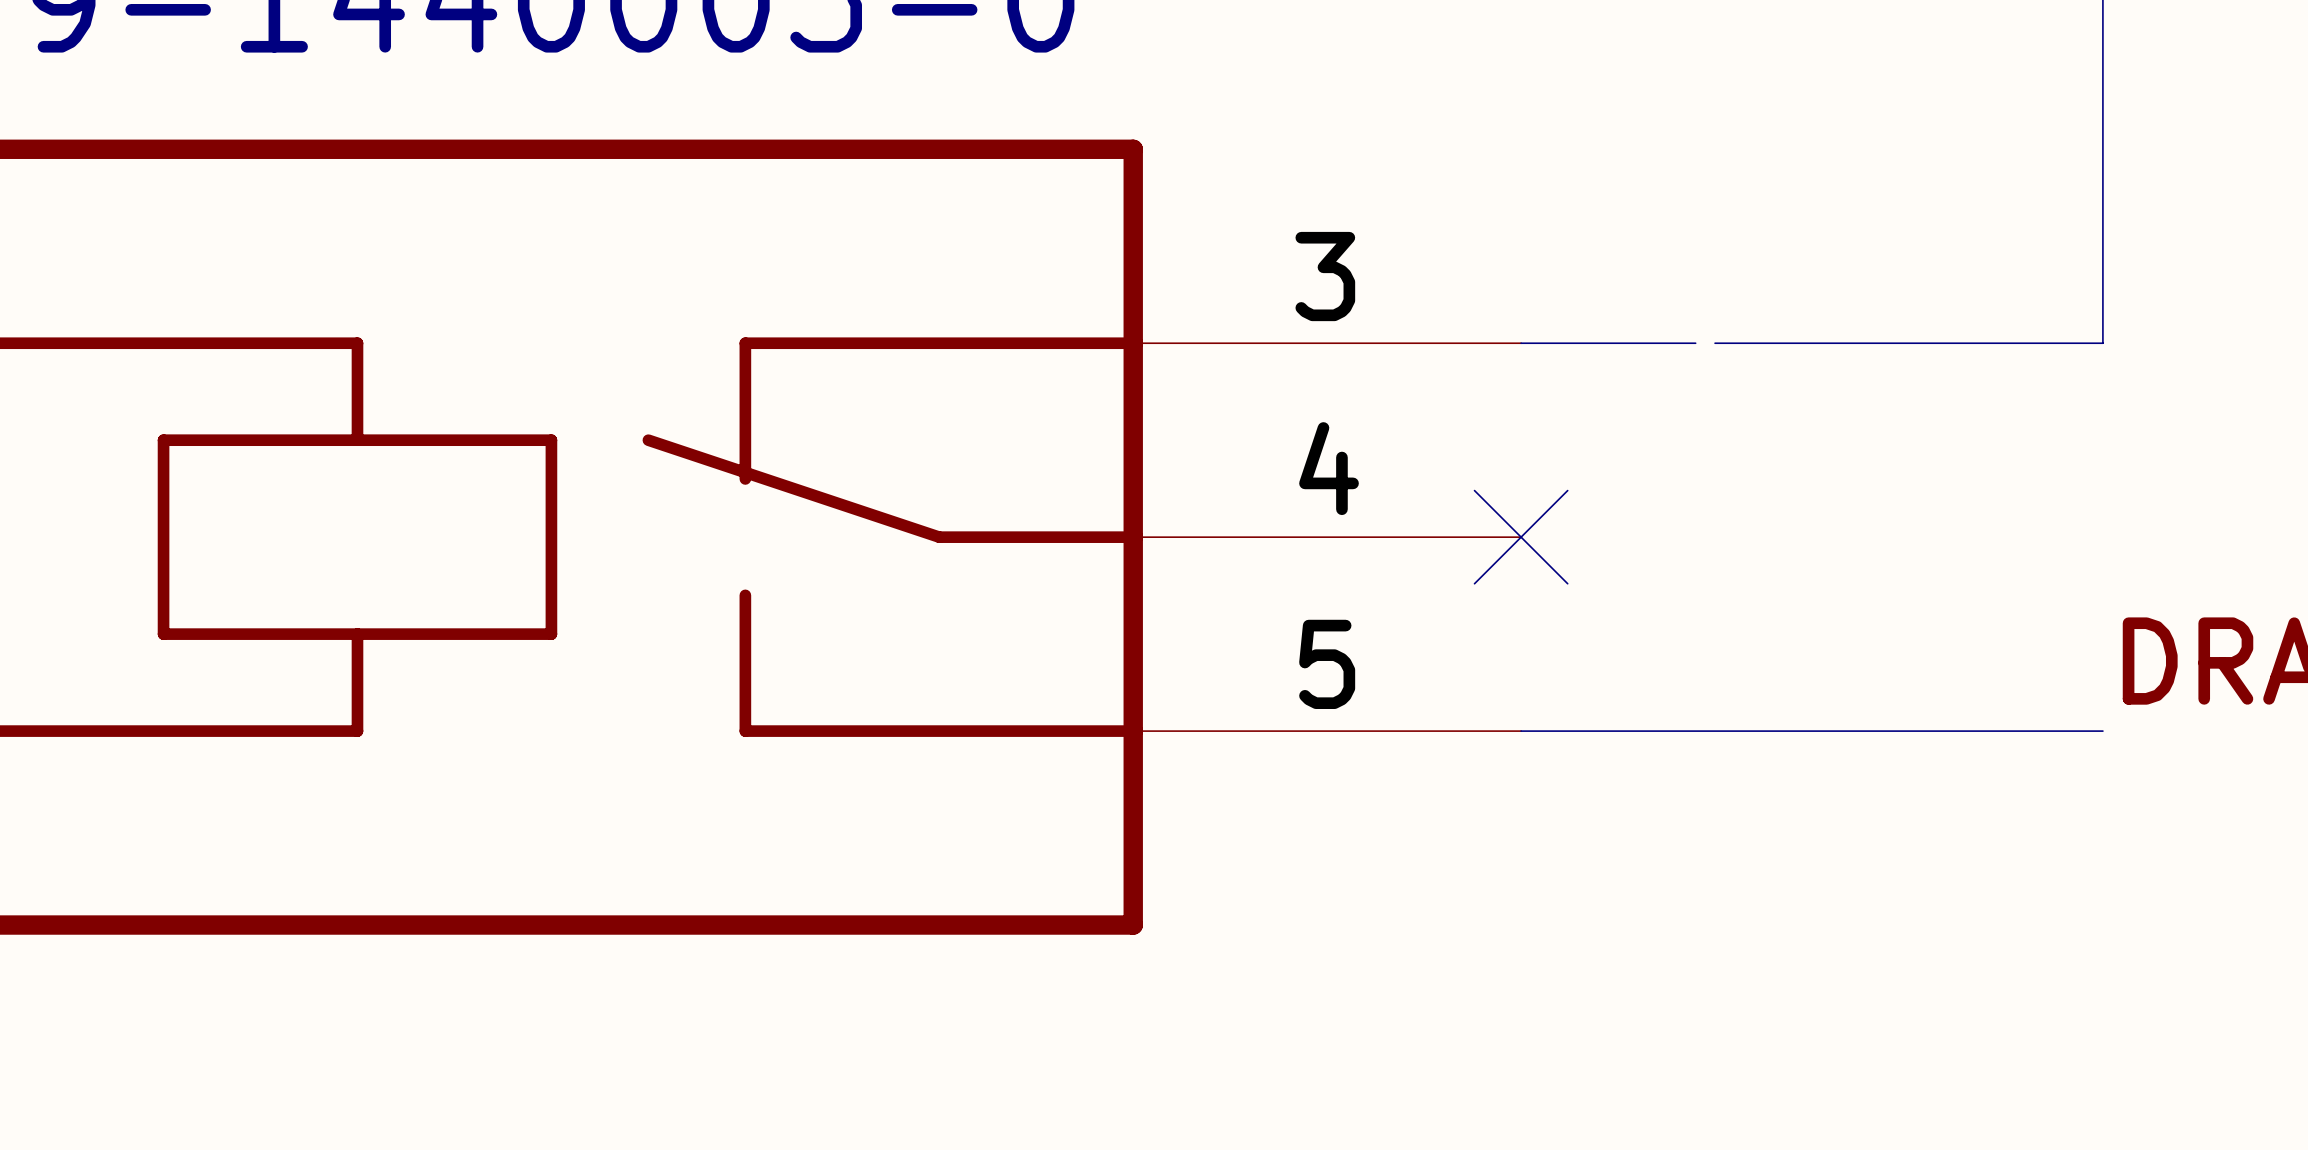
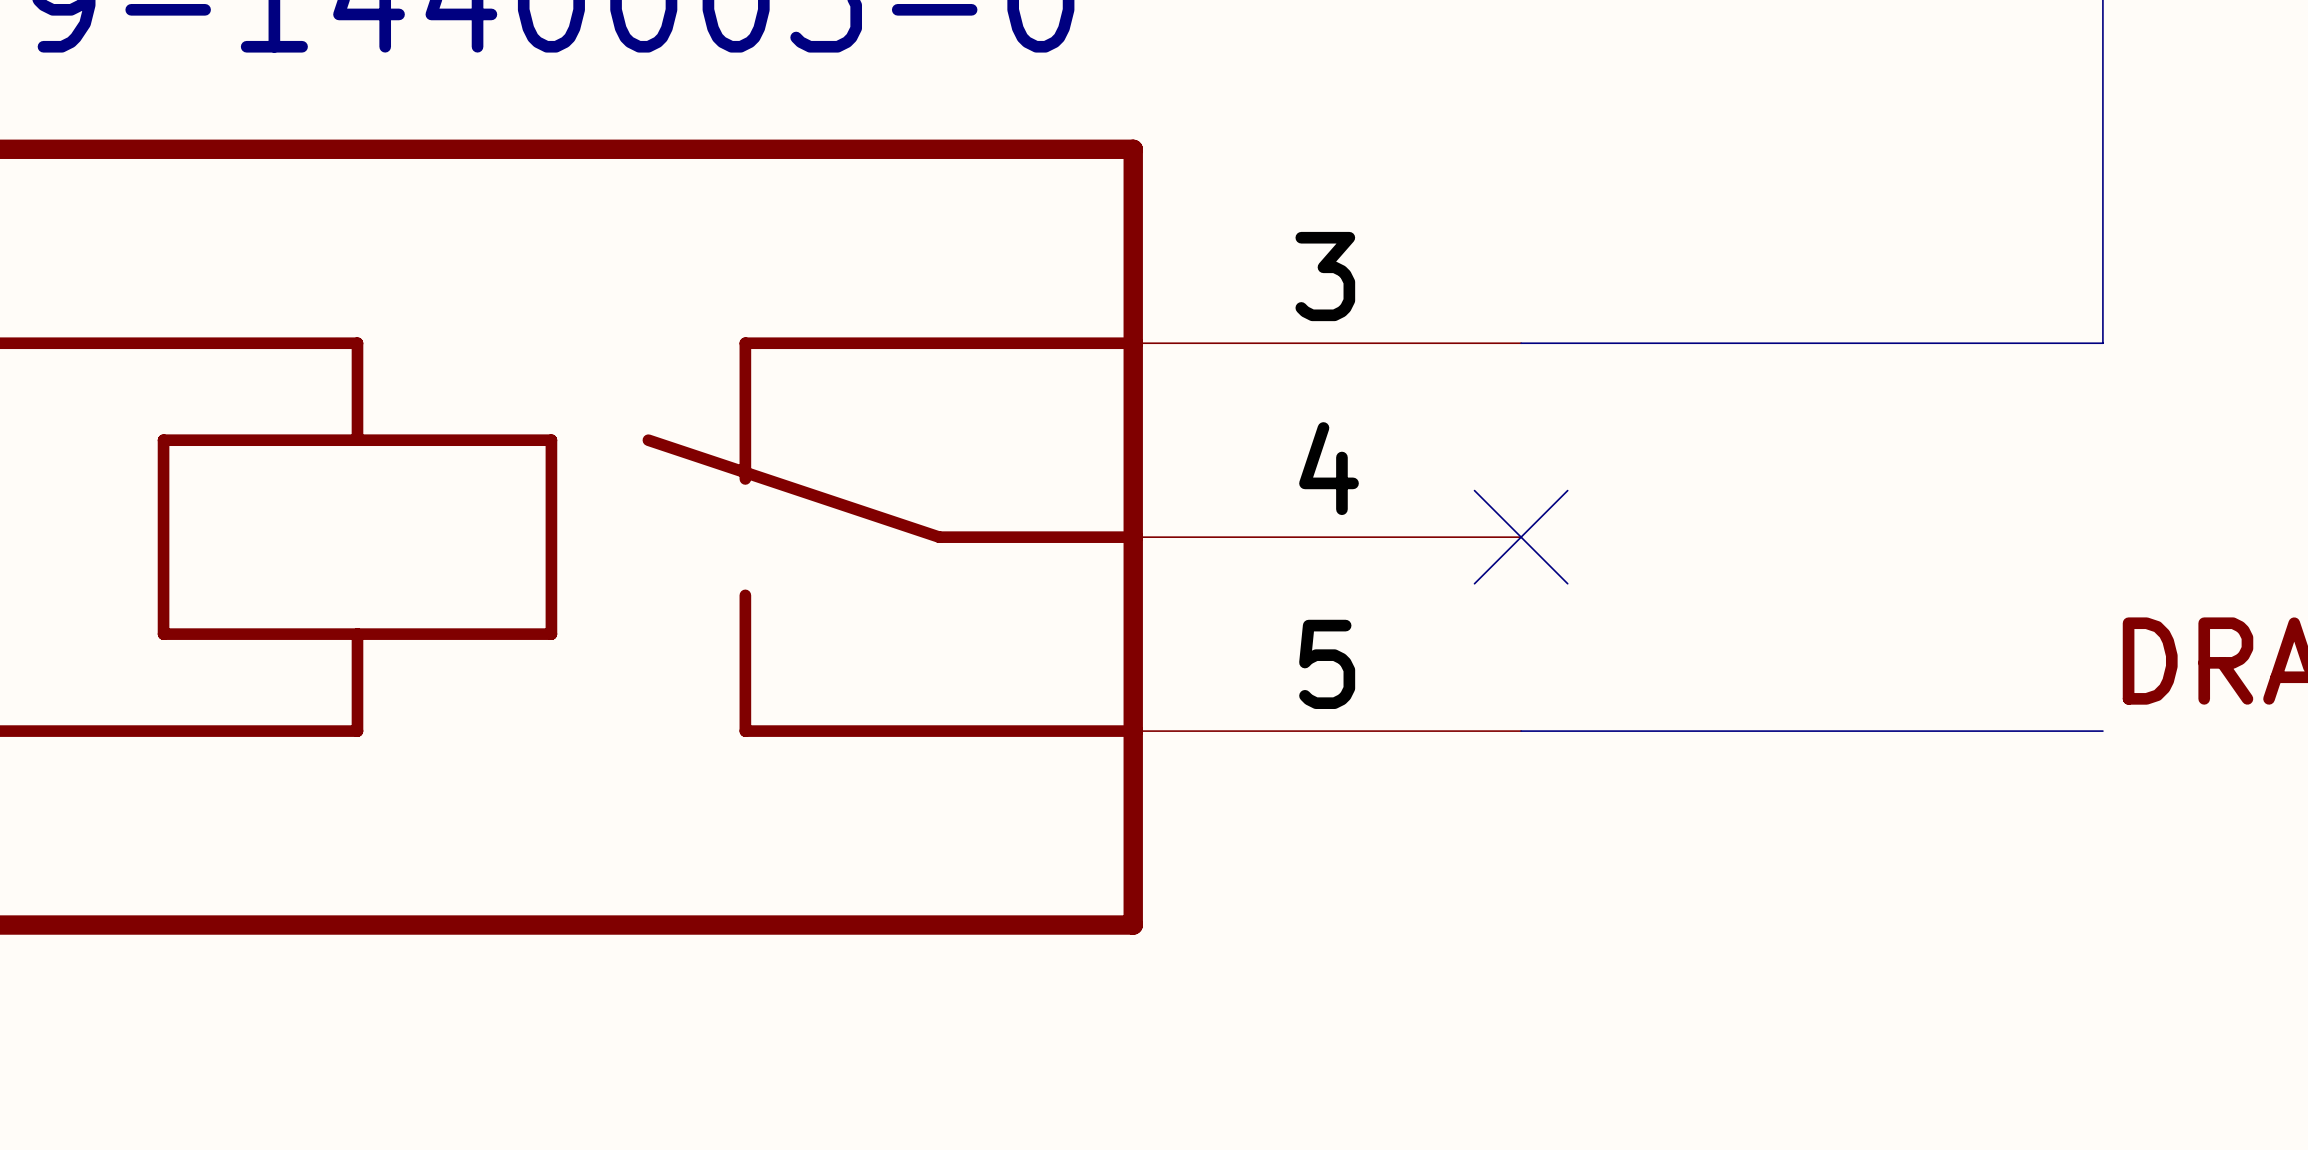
wire: none -> (1695, 343) (1715, 343)

